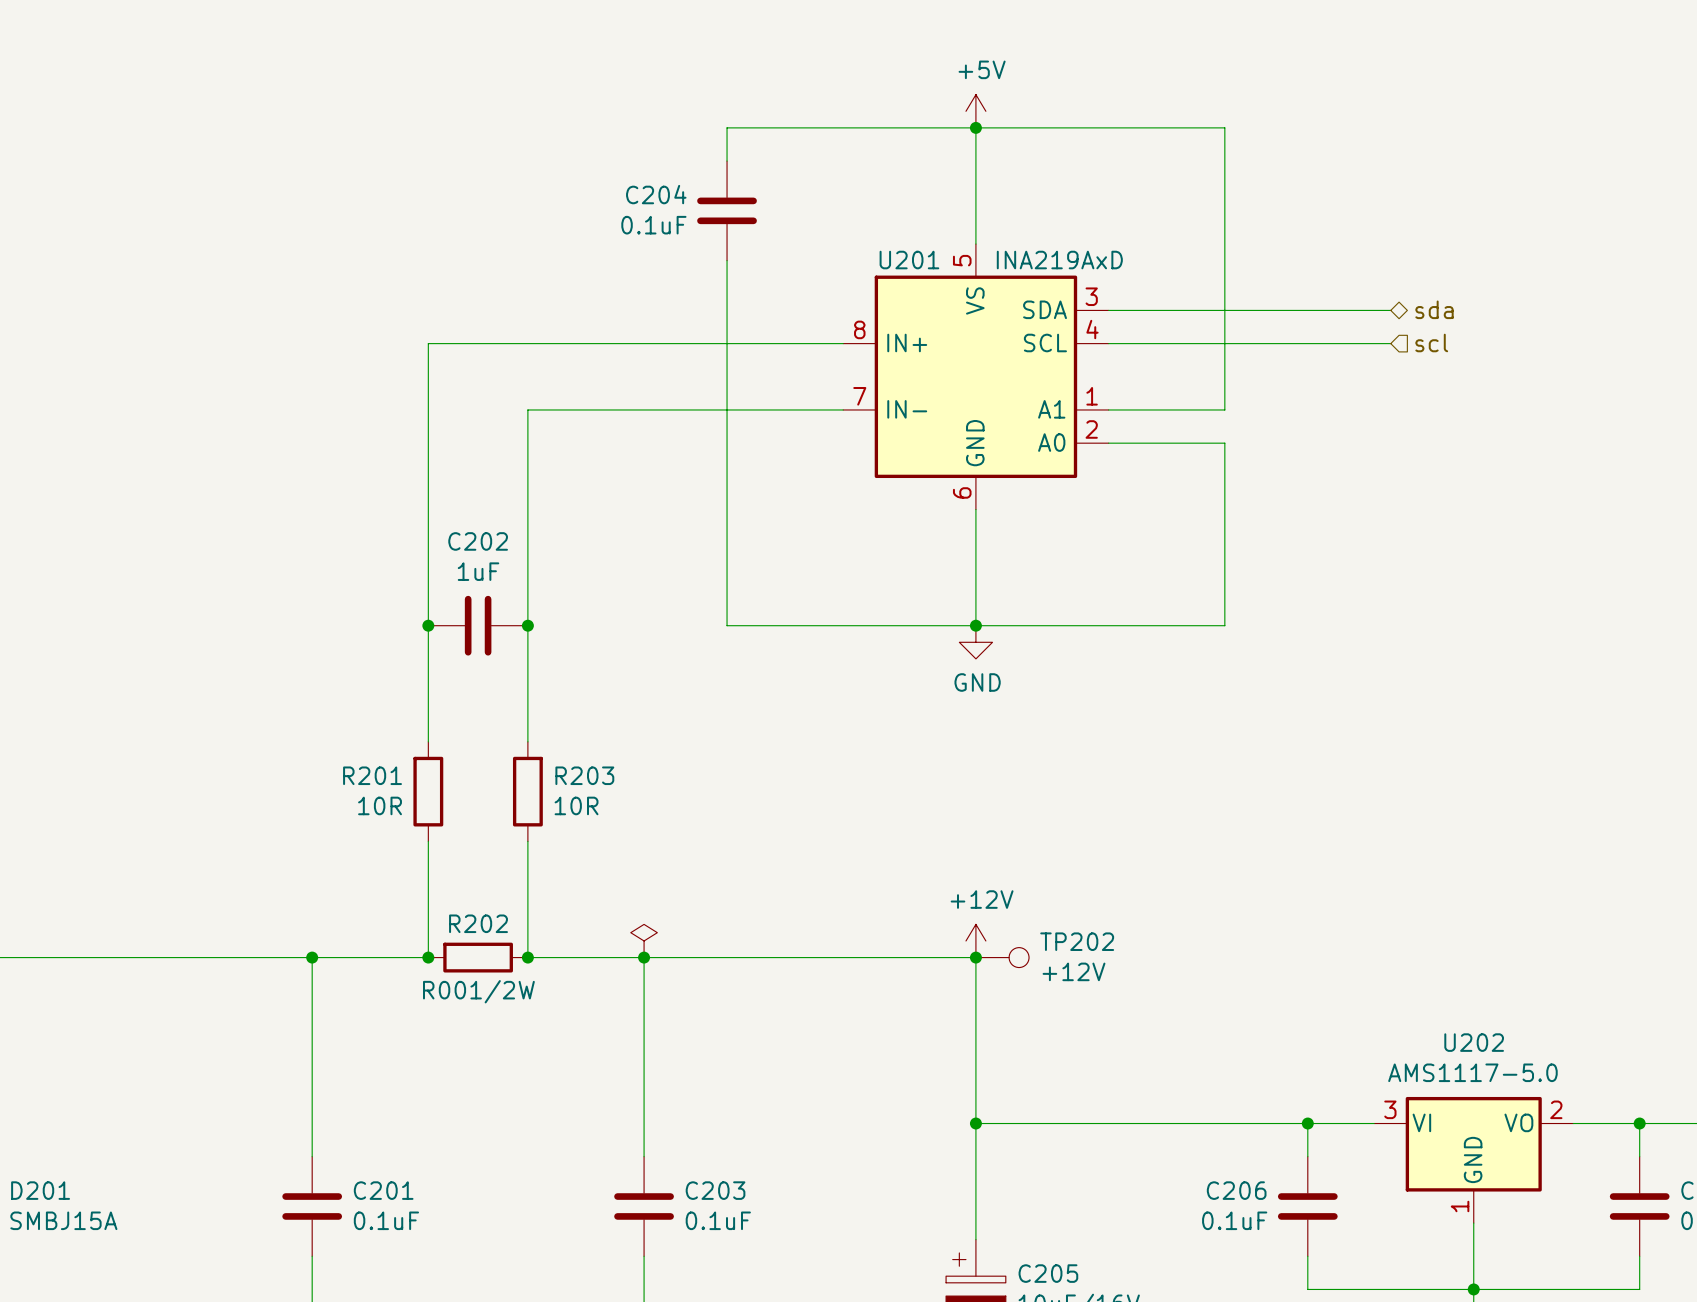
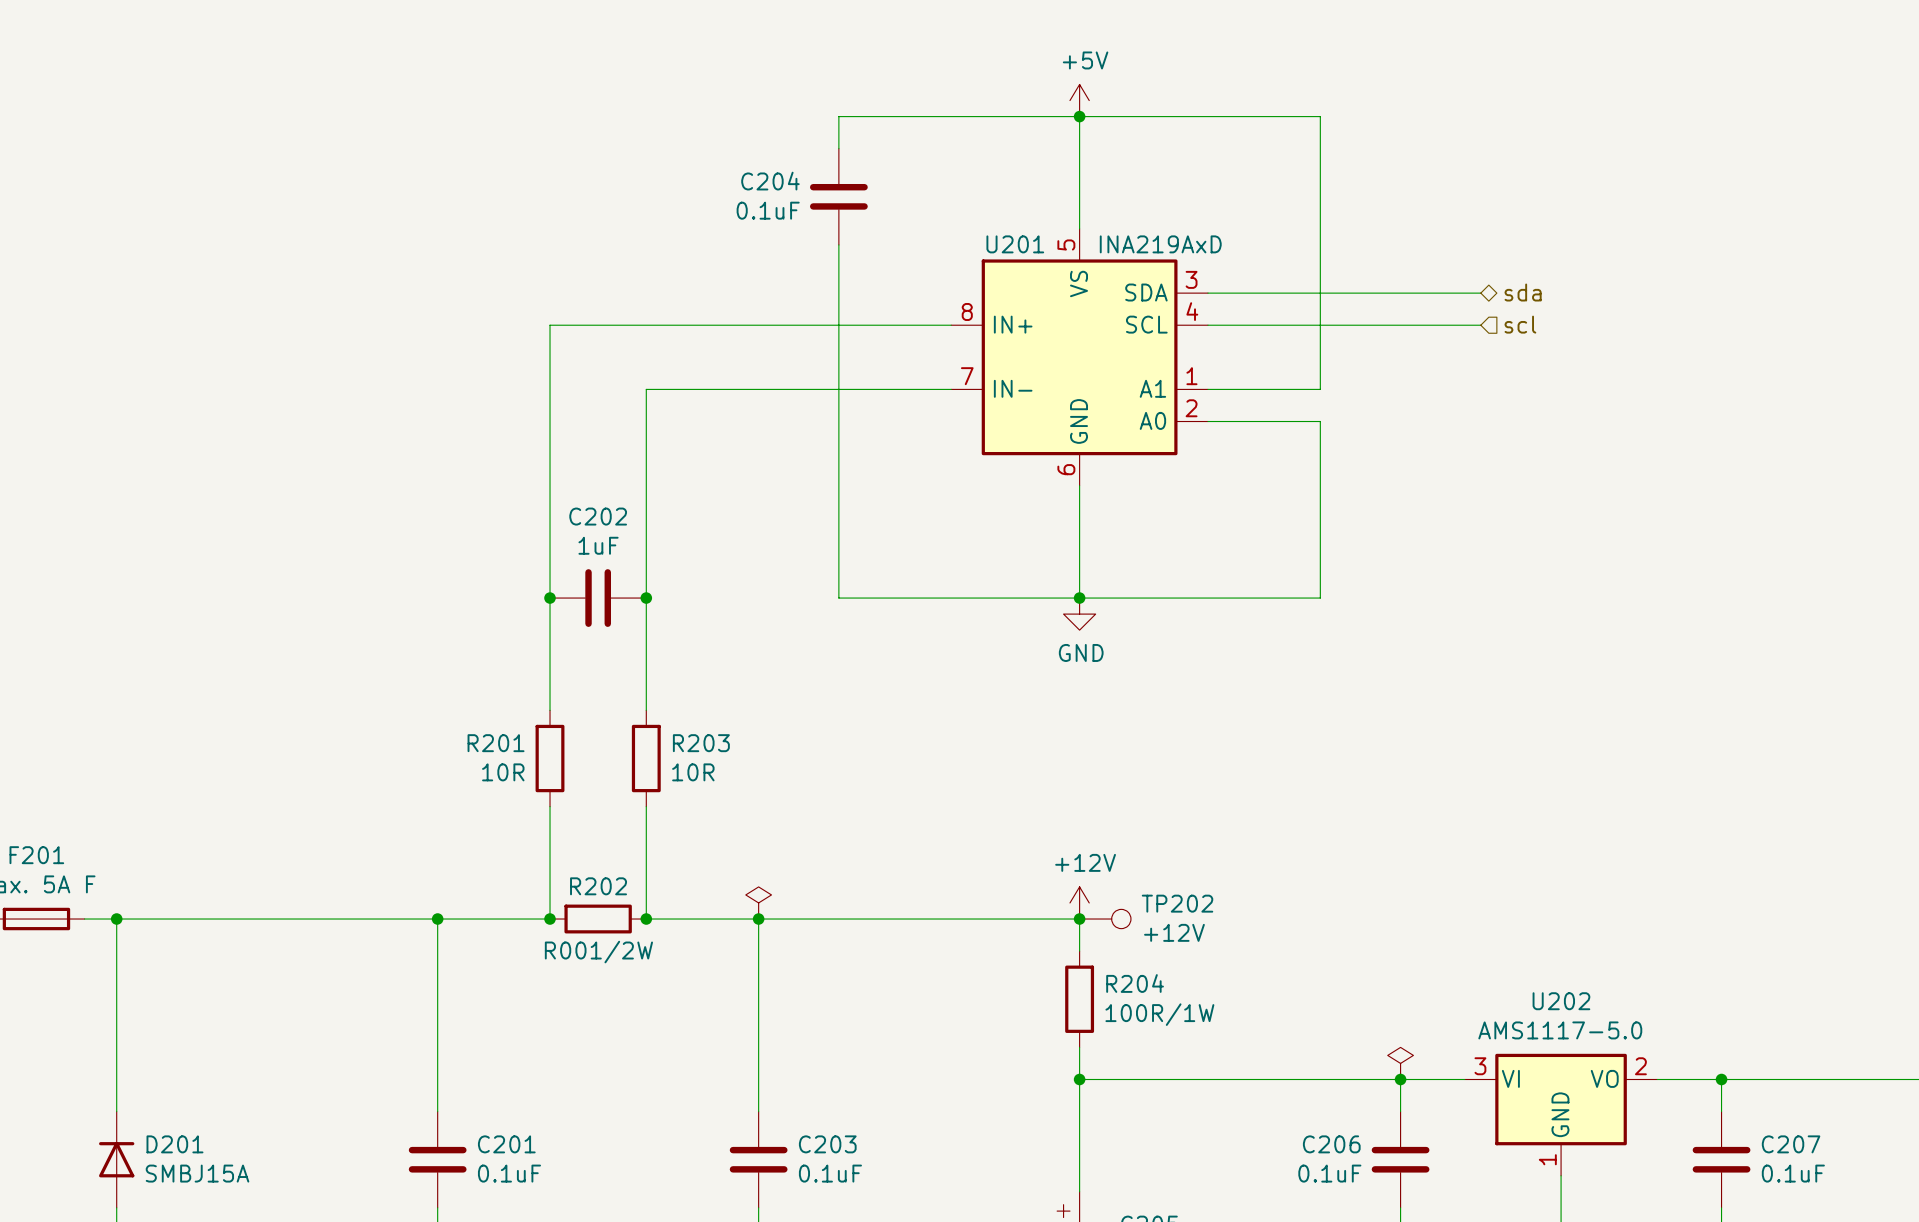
wire: (975, 990) (975, 1090) -> none
R204: none -> 100R/1W (1079, 999)
power symbol: none -> (1400, 1063)

